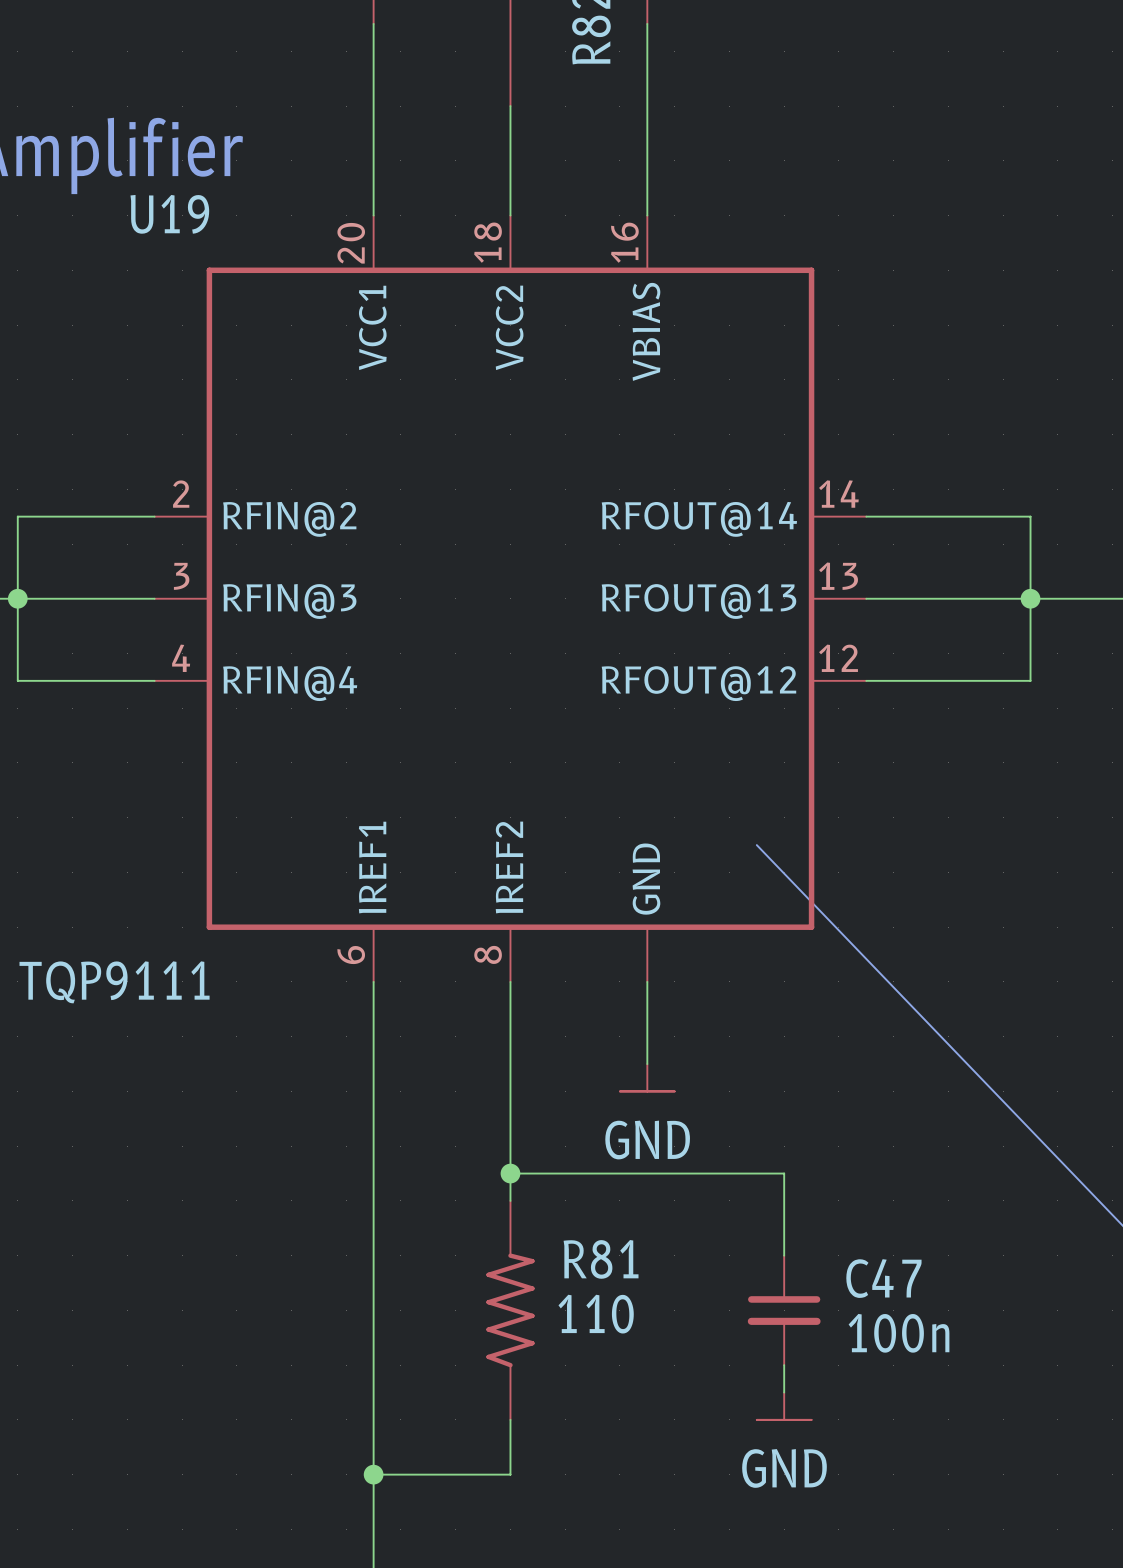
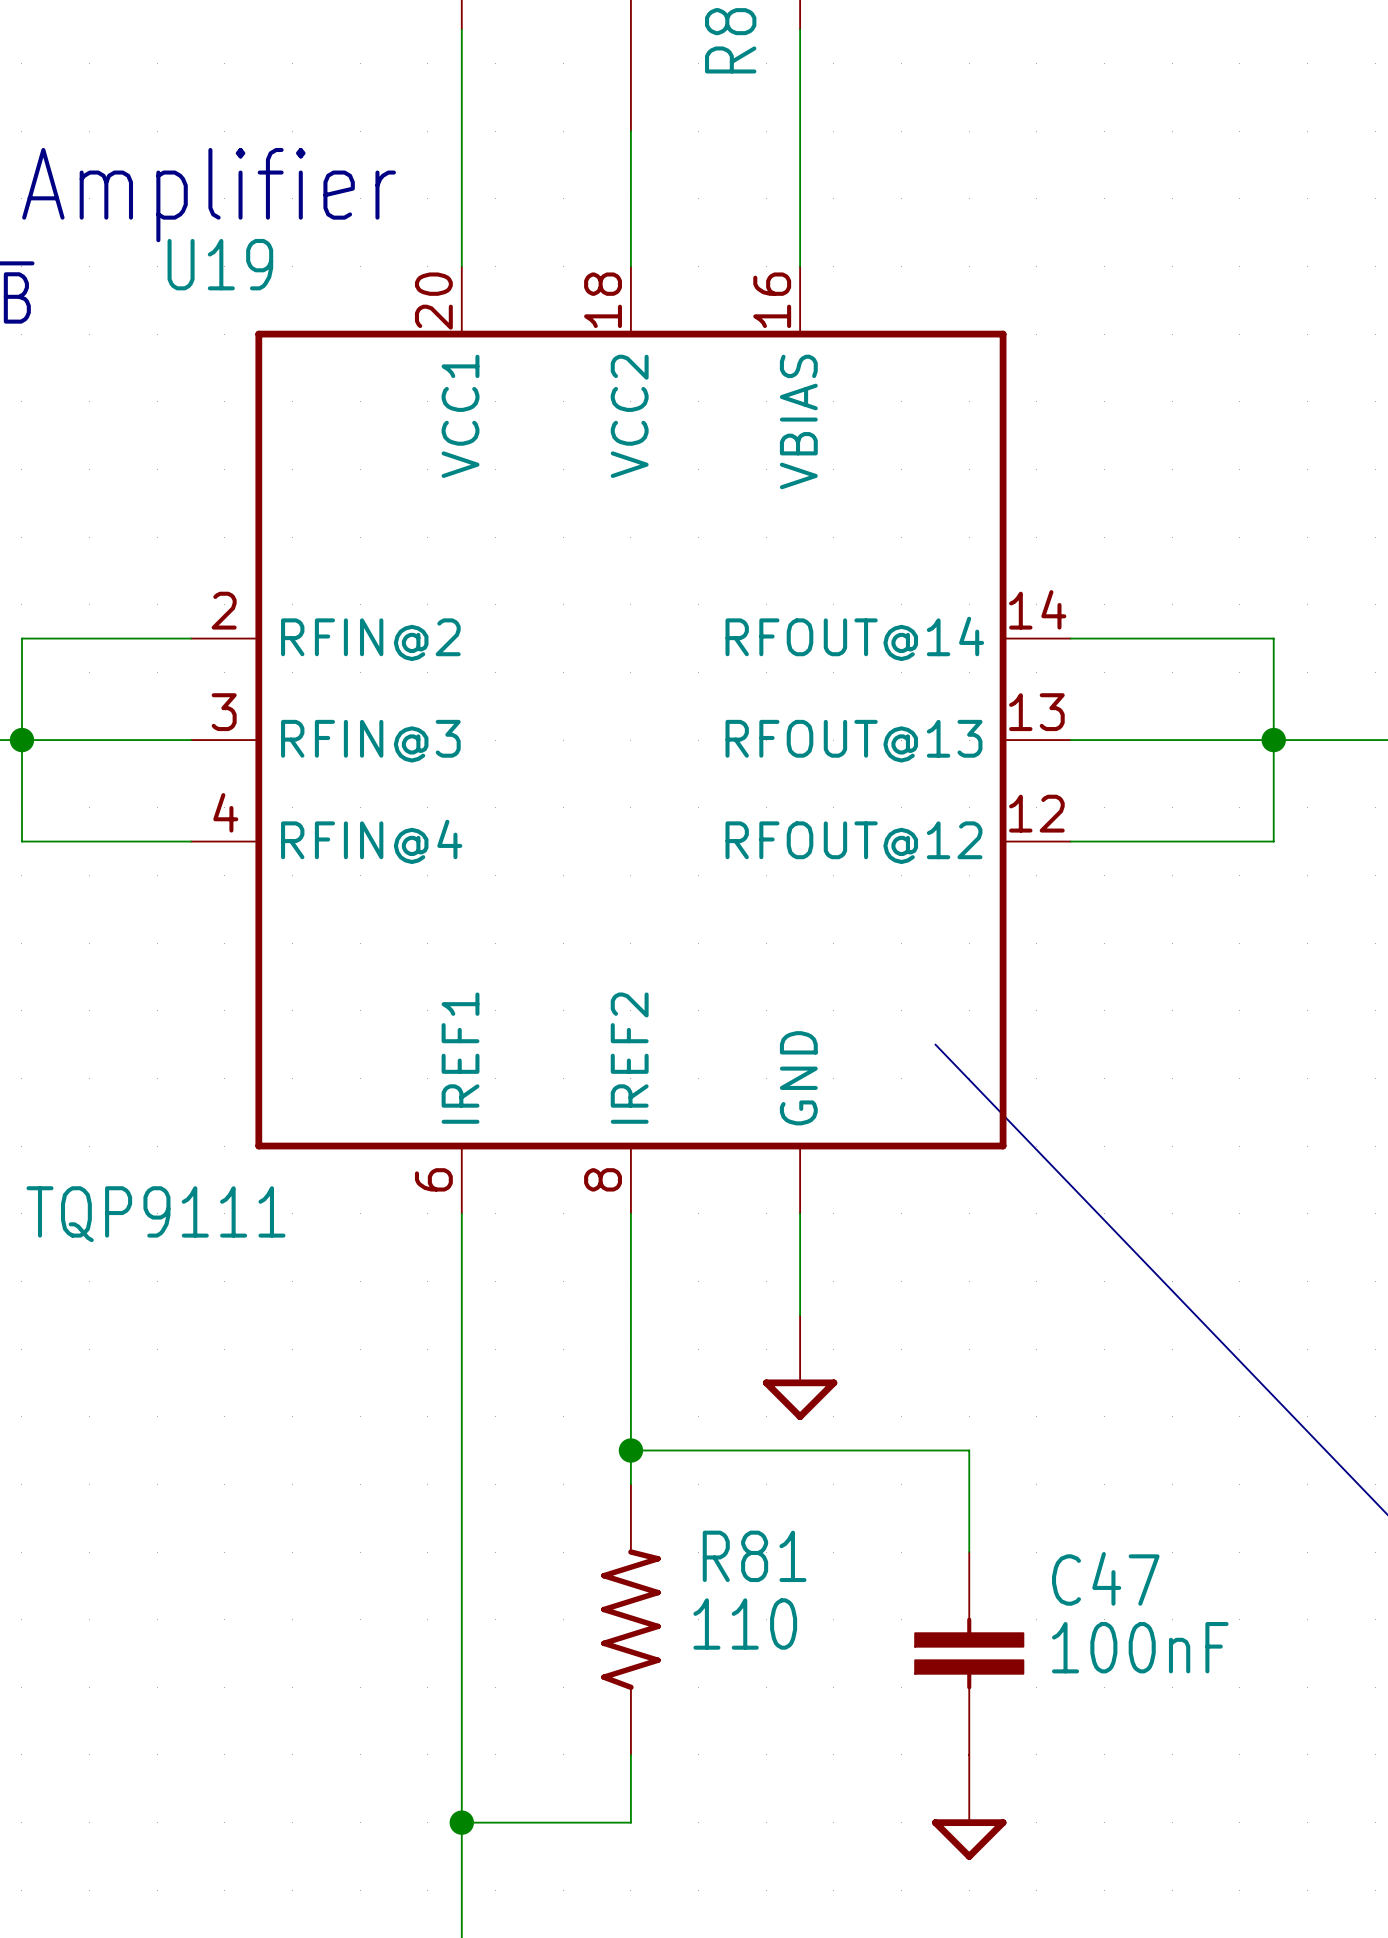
power symbol: GND (647, 1077) -> none
power symbol: none -> (800, 1367)
C47 symbol: [747, 1255, 821, 1366] -> [915, 1552, 1024, 1755]
C47 value: 100n (899, 1333) -> 100nF (1140, 1647)
power symbol: GND (784, 1406) -> none
power symbol: none -> (969, 1807)

